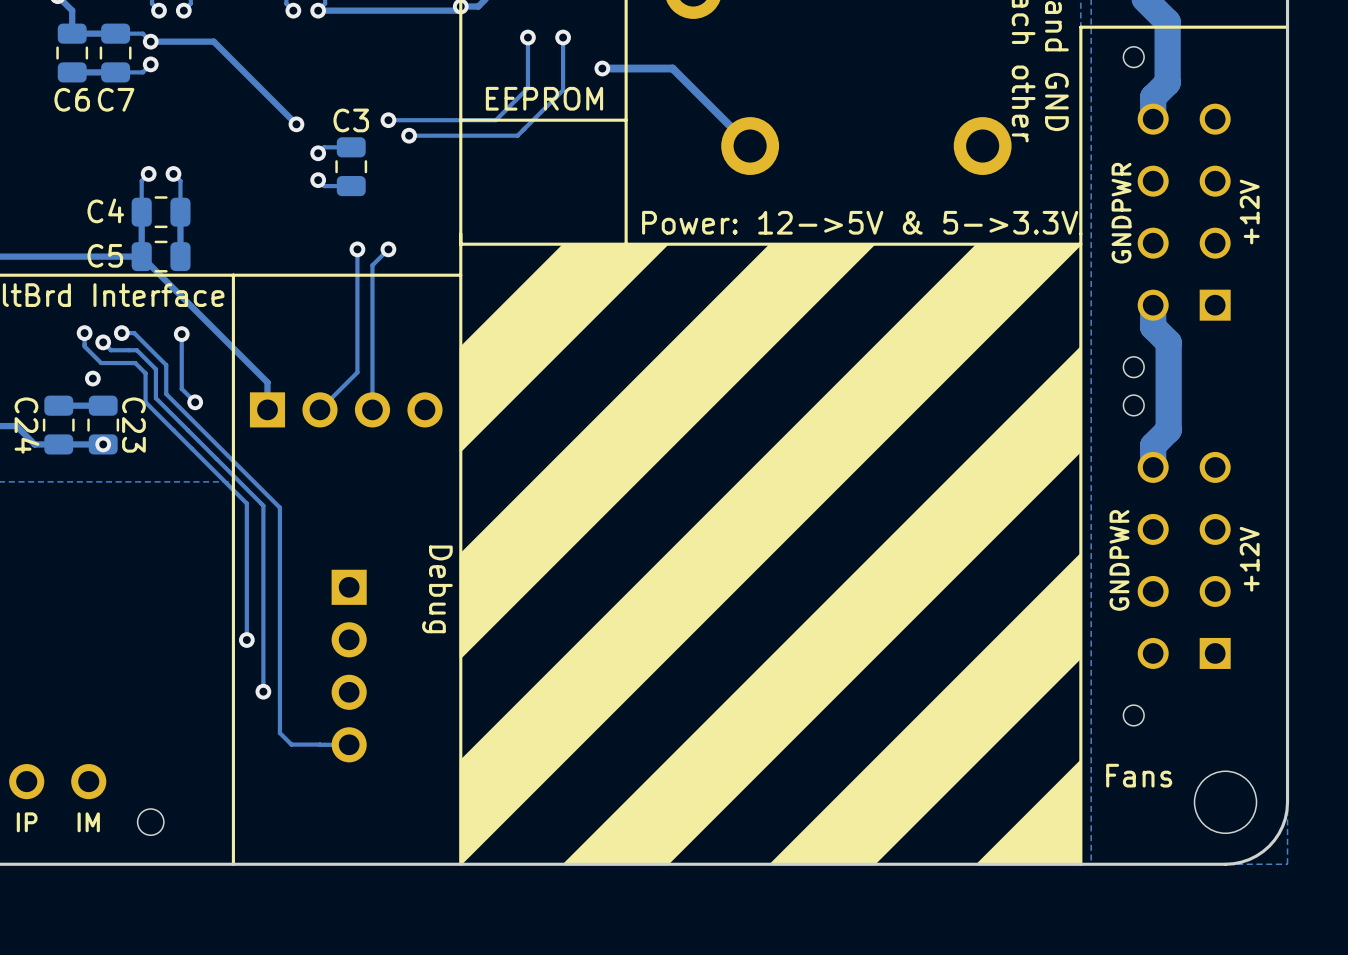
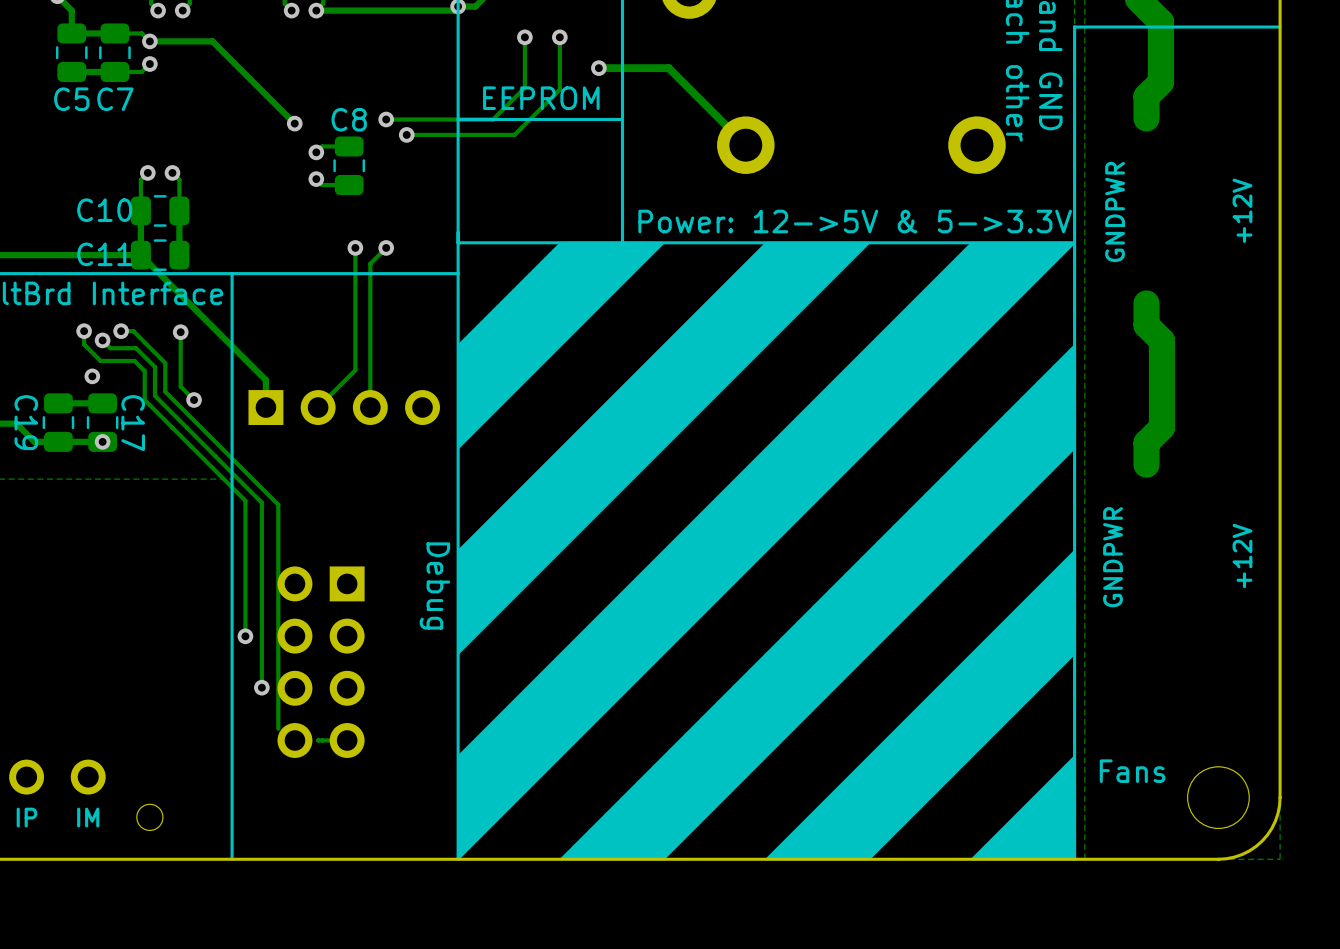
C6 name: C6 (72, 99) -> C5 (71, 99)
C3 name: C3 (351, 120) -> C8 (349, 119)
C4 name: C4 (105, 210) -> C10 (104, 210)
part: (1177, 212) -> none
C5 name: C5 (105, 255) -> C11 (104, 254)
C24 name: C24 (26, 425) -> C19 (26, 422)
C23 name: C23 (133, 425) -> C17 (133, 423)
part: (1177, 560) -> none
part: none -> (321, 662)
track: (279, 733) (291, 744) (319, 744) -> none

